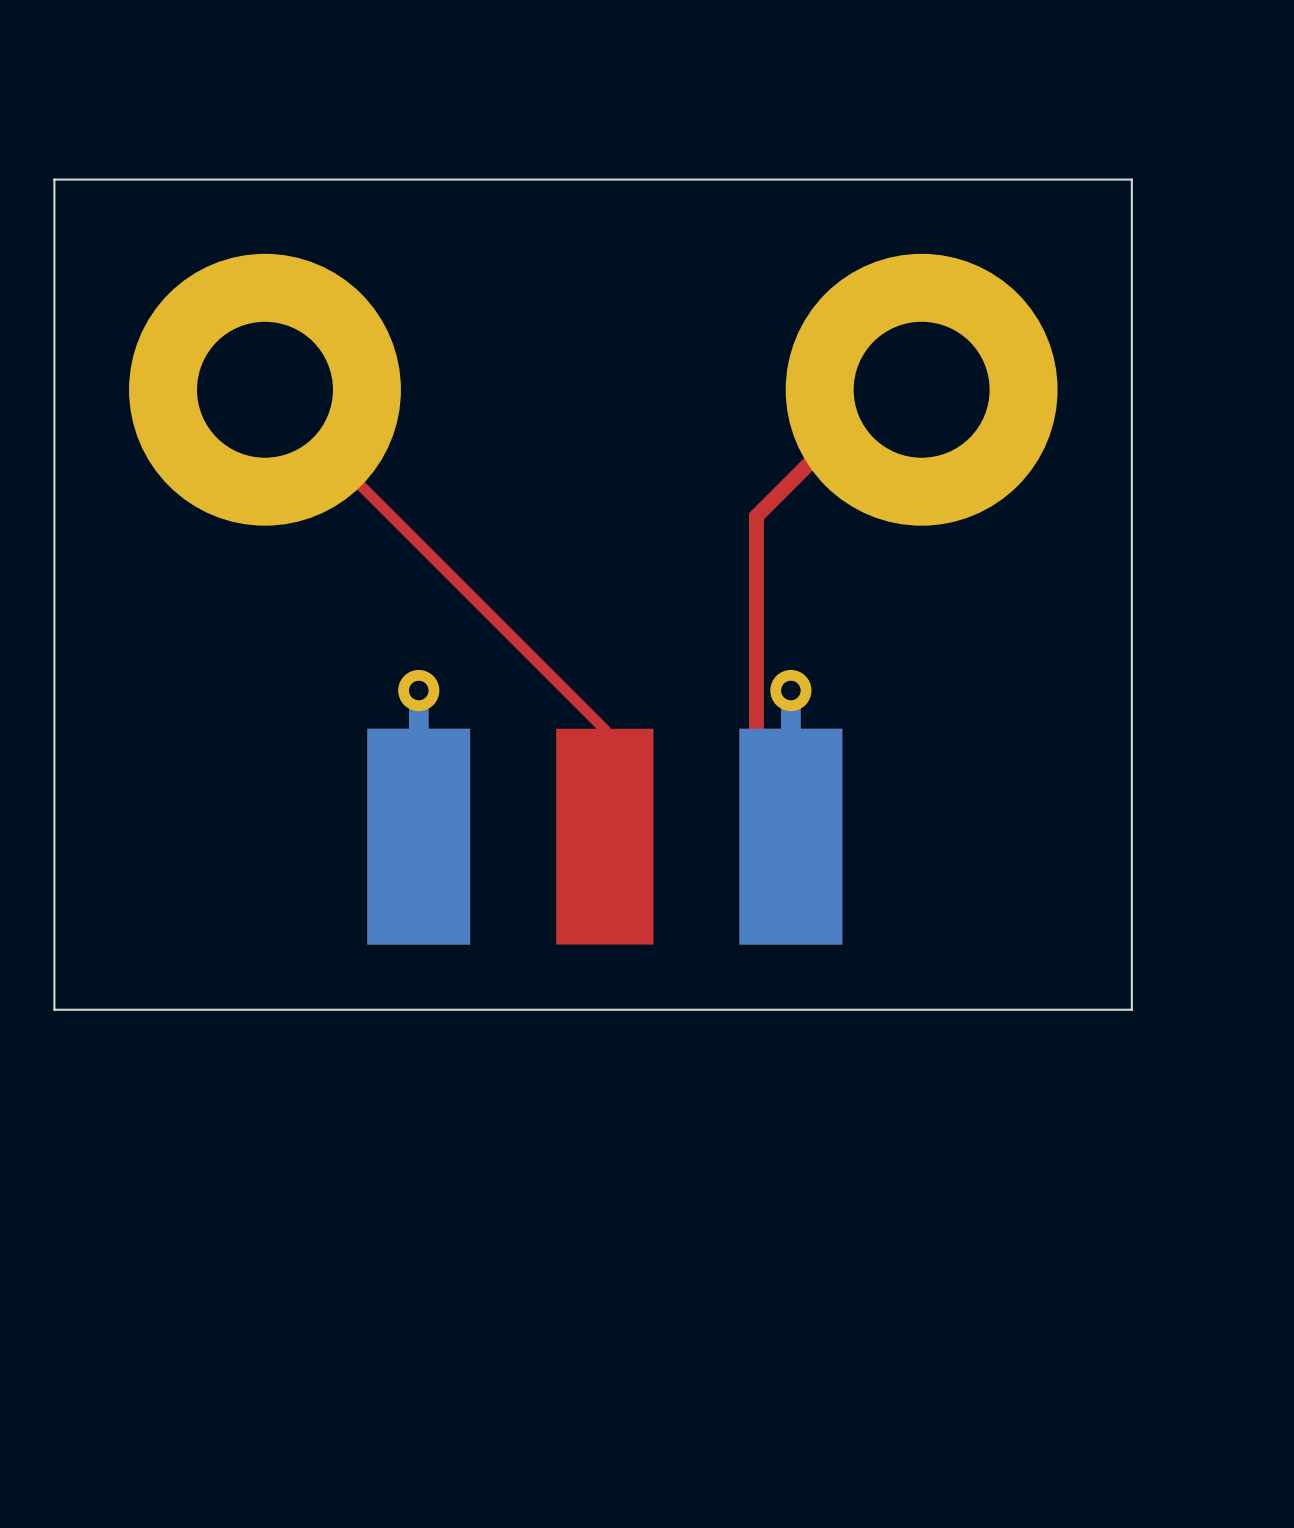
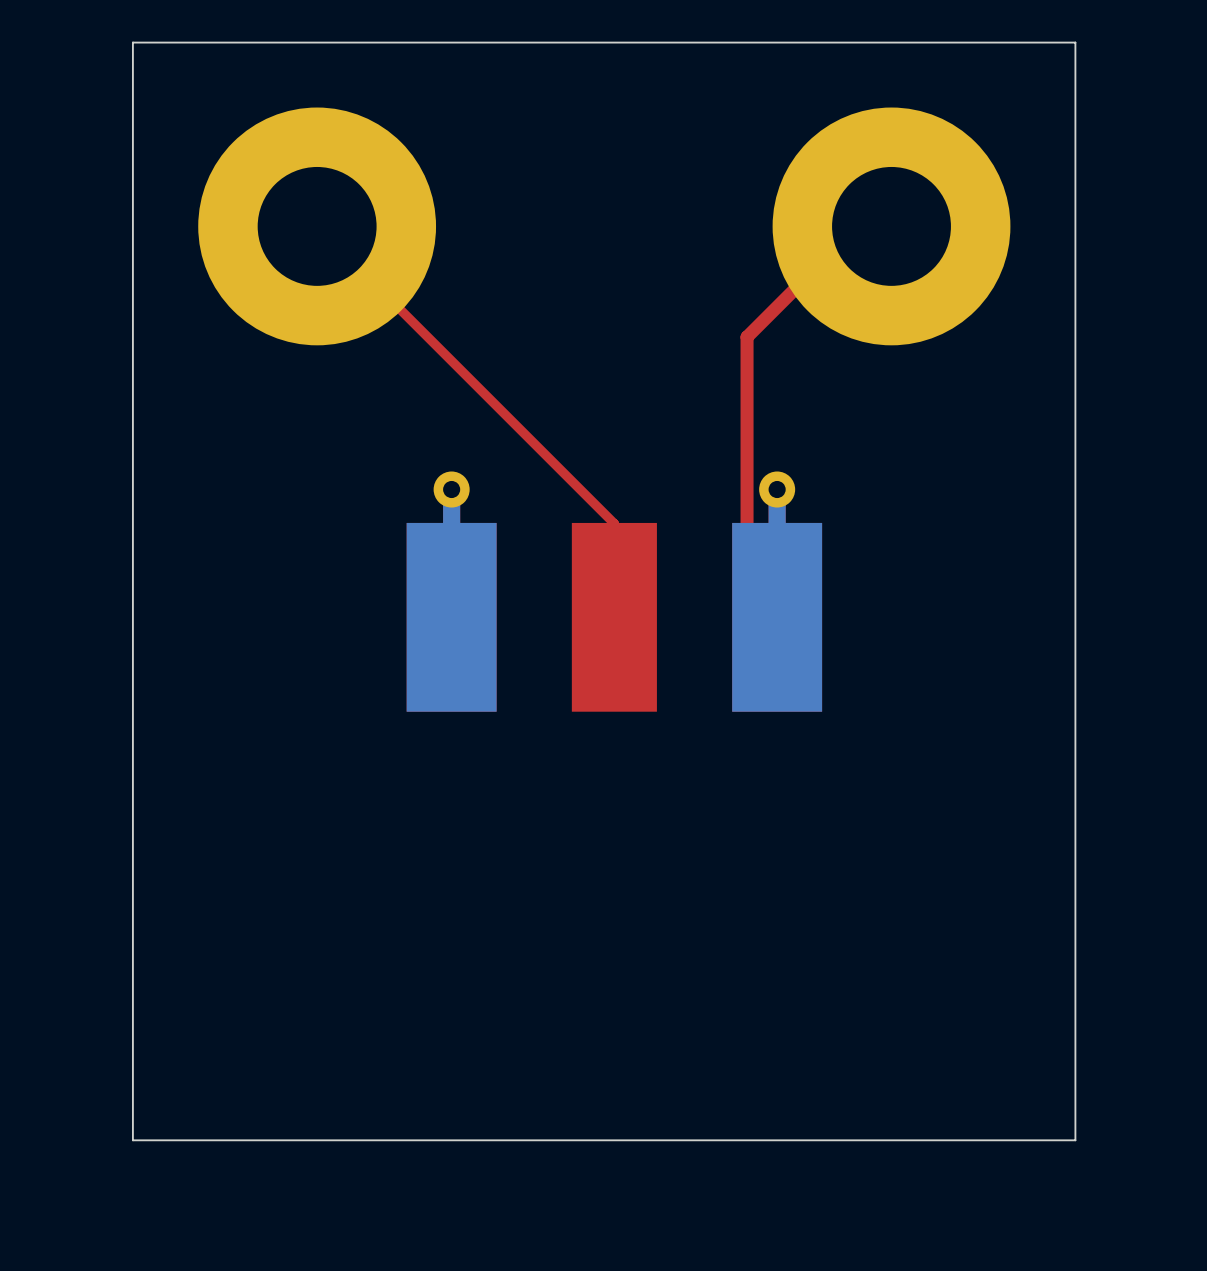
board edge: (1131, 1009) (54, 1009) -> (1075, 768) (1075, 1140) (132, 1140) (132, 768)

